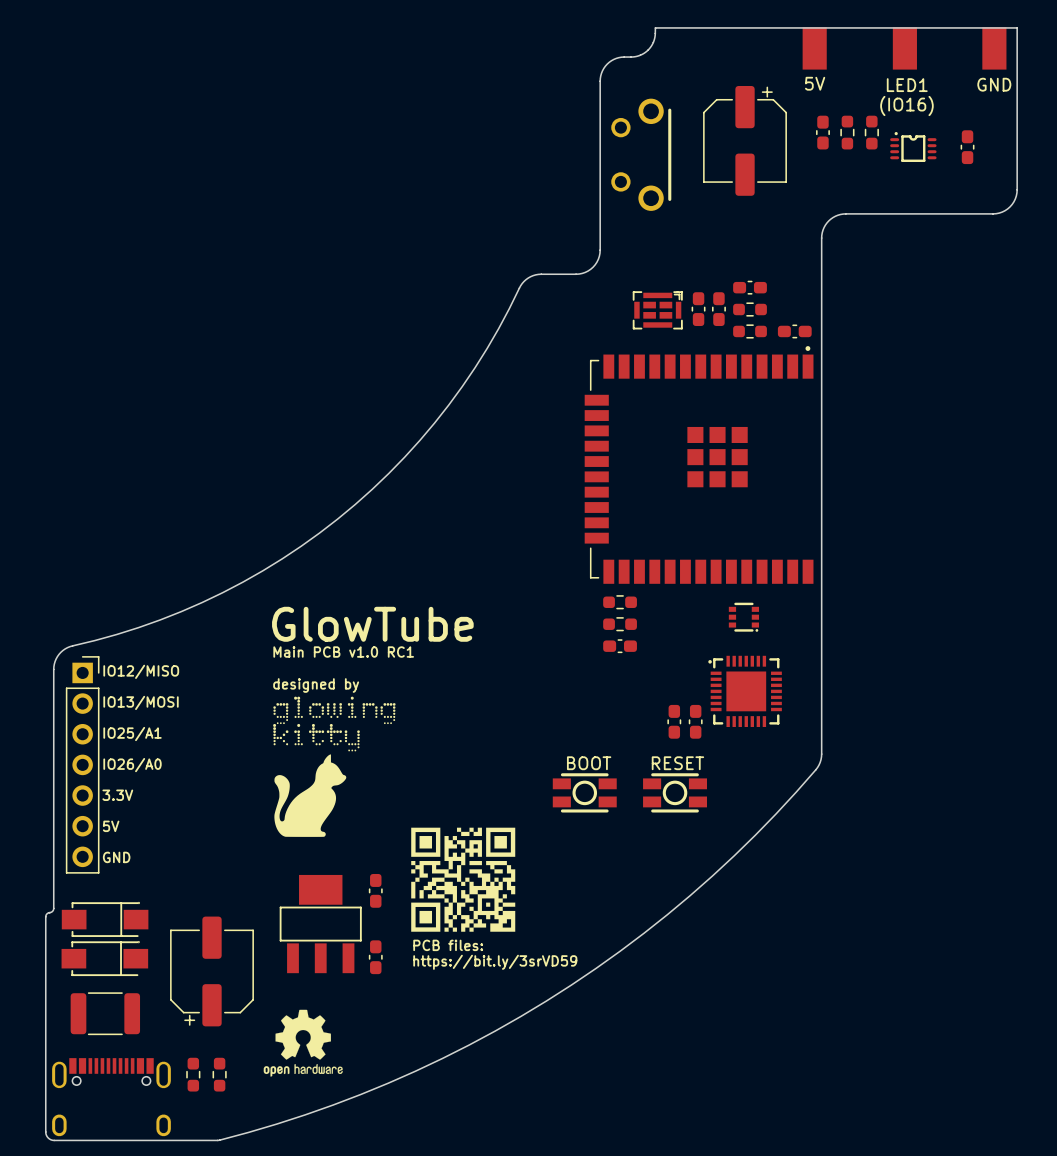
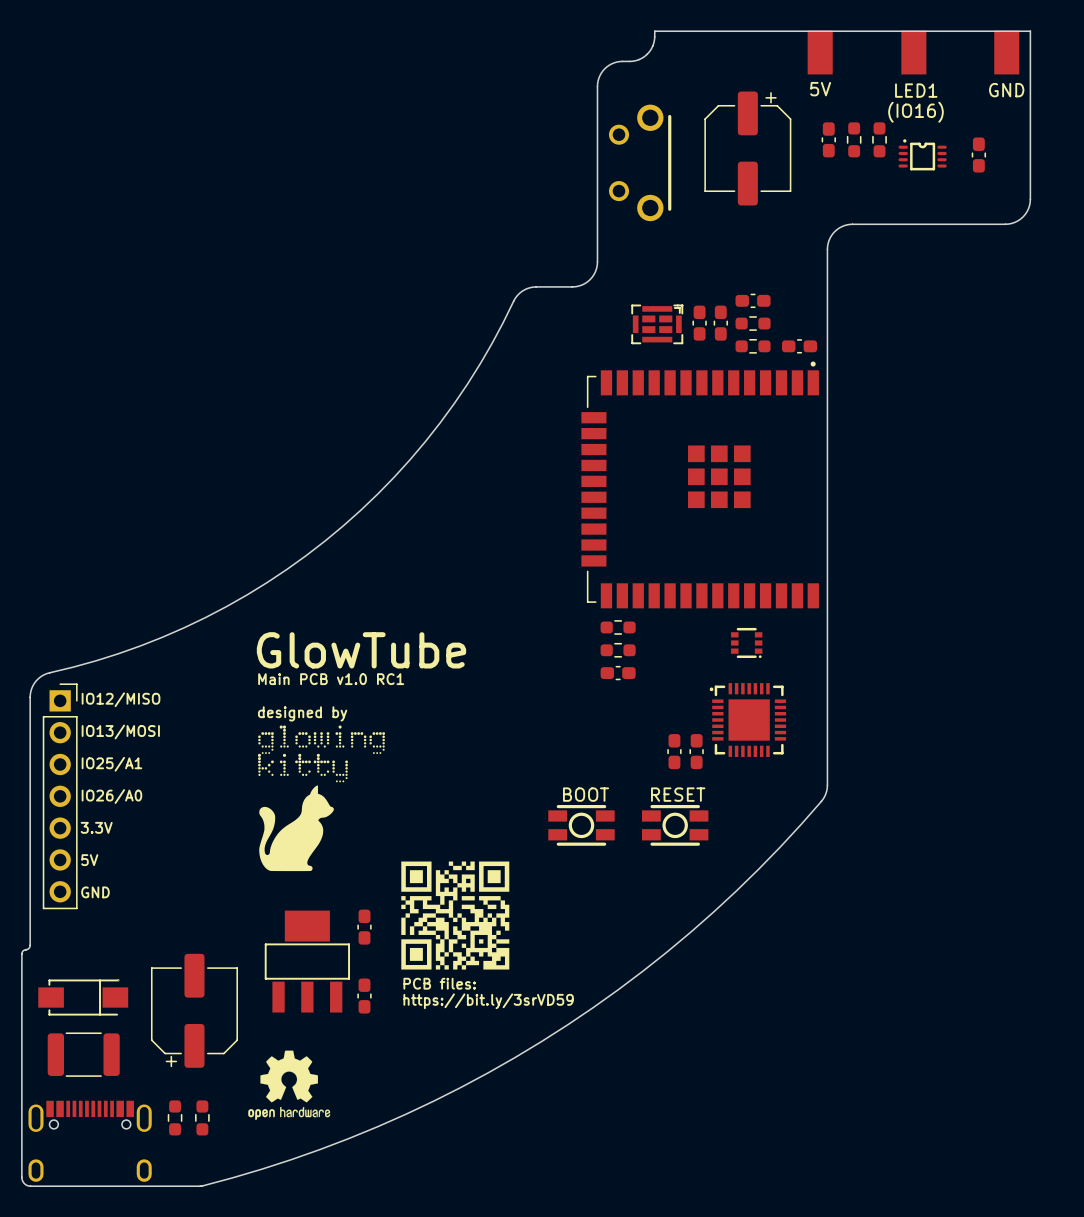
part: (105, 919) -> none

